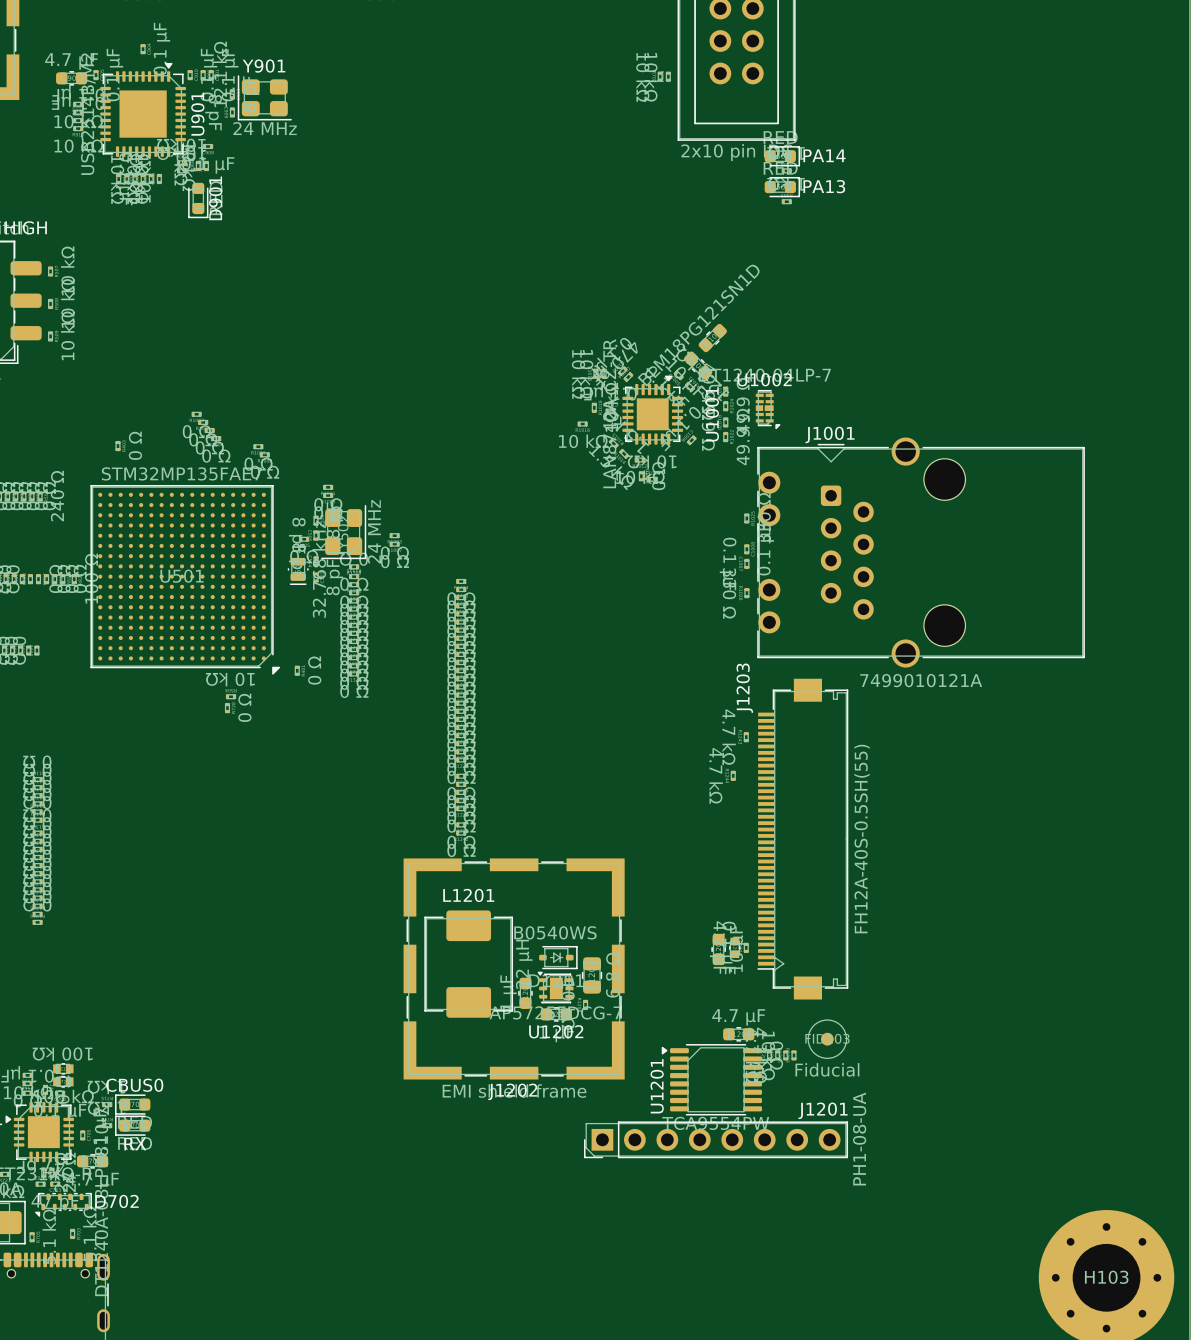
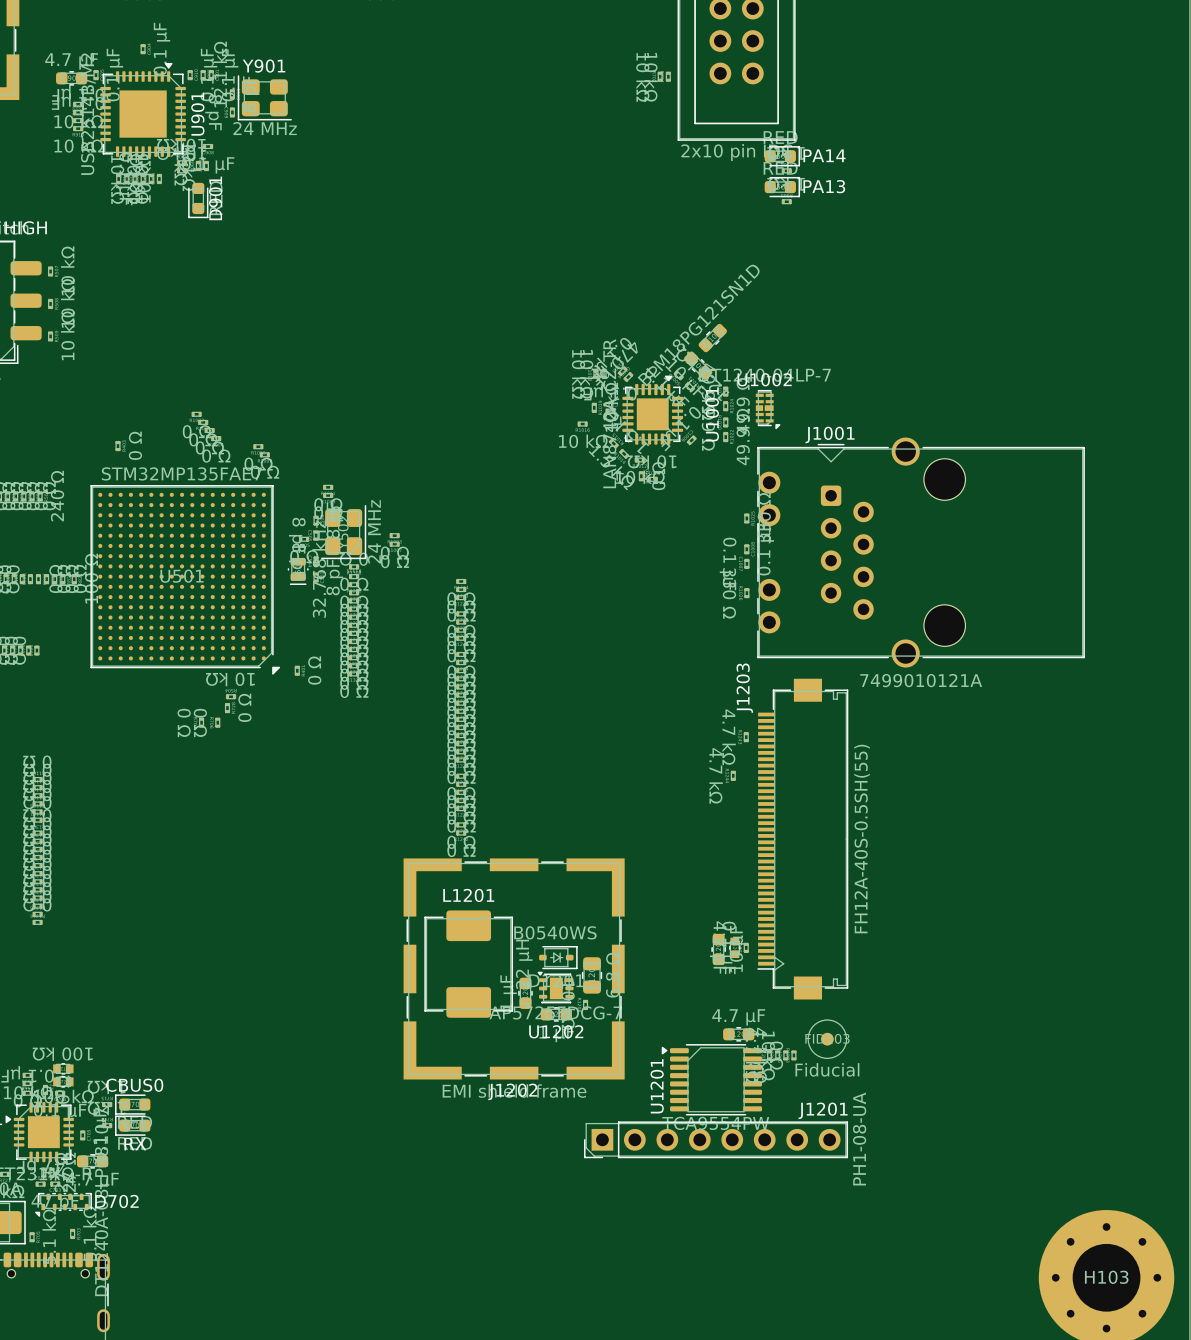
part rotation: 0° (461, 605) -> 90° clockwise (217, 722)
part position: (461, 605) -> (217, 722)
part rotation: 0° (461, 646) -> 90° clockwise (201, 722)
part position: (461, 646) -> (201, 722)

